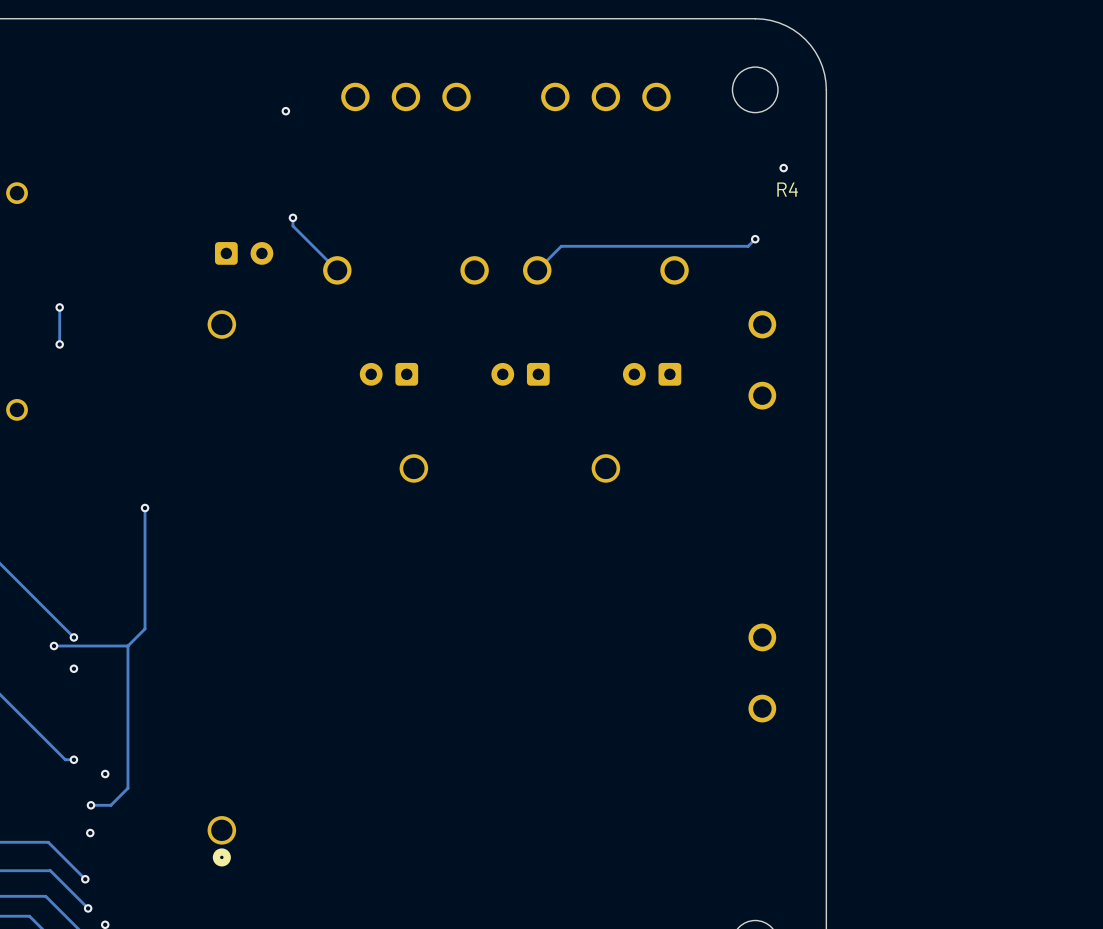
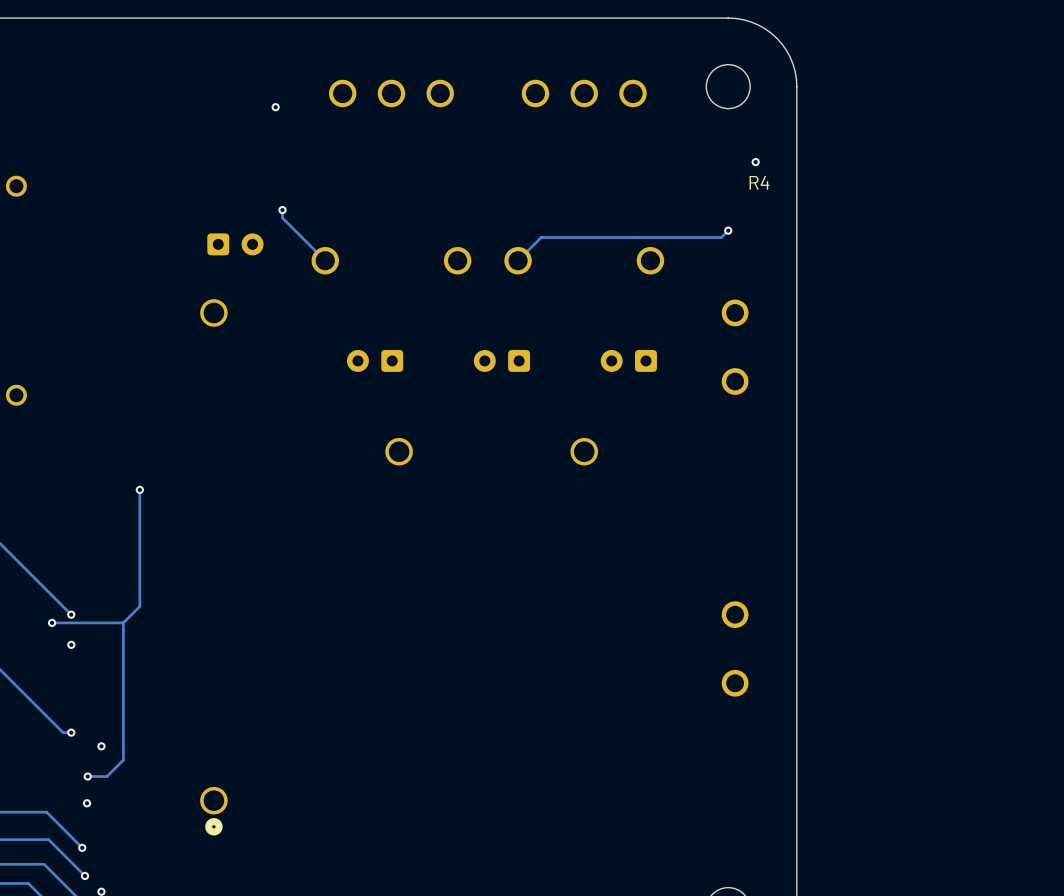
track: (59, 307) (59, 344) -> none
via: (59, 307) -> none
via: (59, 344) -> none

